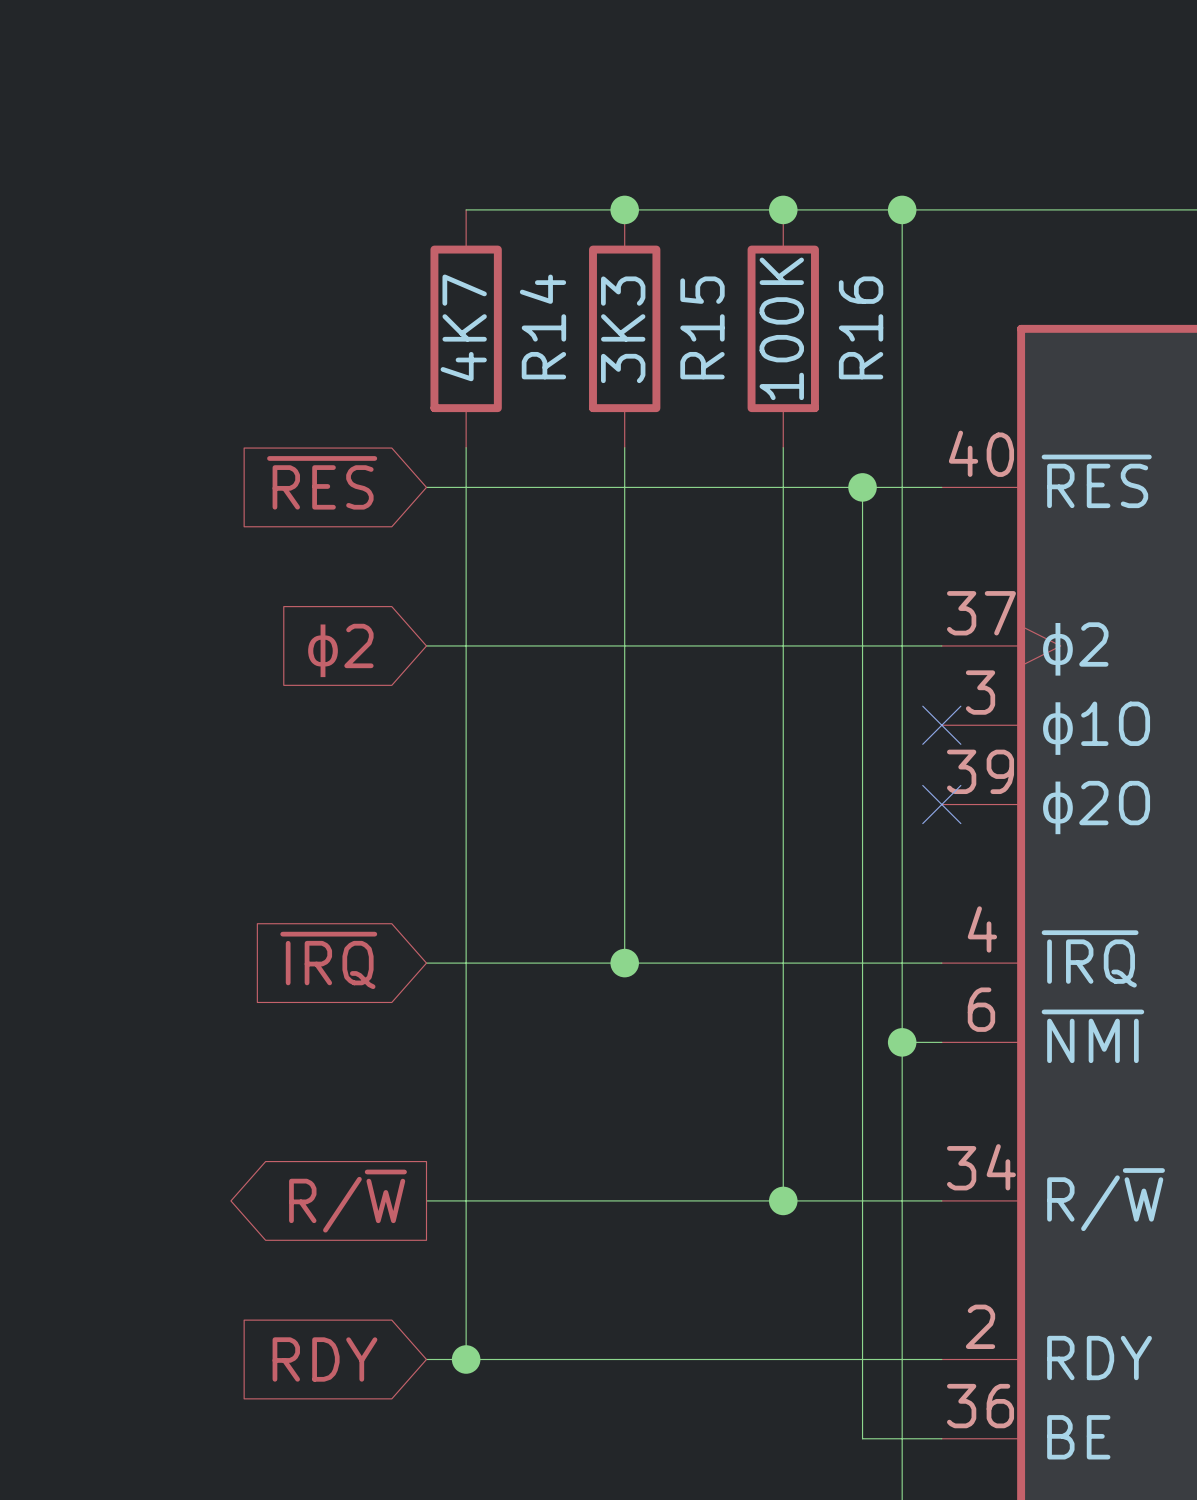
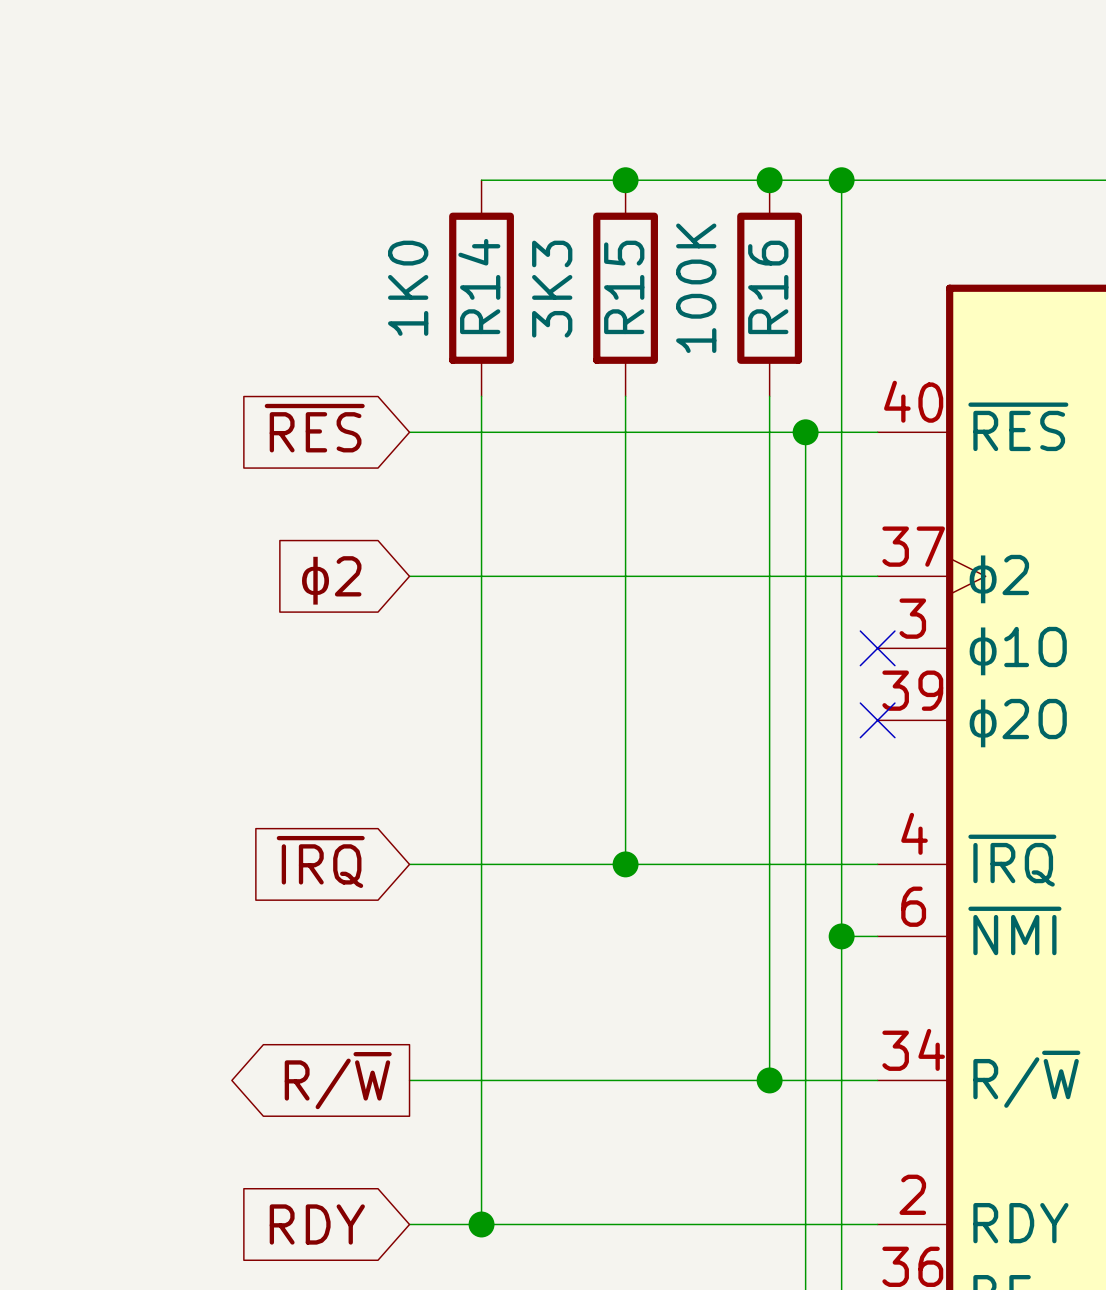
wire: (466, 209) (505, 209) -> none
junction position: (624, 209) -> (625, 180)
junction position: (783, 209) -> (769, 180)
R14 name position: R14 (542, 326) -> R14 (479, 286)
R14 value: 4K7 (463, 327) -> 1K0 (408, 288)
R15 name position: R15 (702, 327) -> R15 (624, 287)
R16 name position: R16 (861, 327) -> R16 (768, 287)
R14 position: (466, 328) -> (481, 288)
R15 position: (624, 328) -> (625, 288)
R16 value position: 100K (781, 328) -> 100K (696, 288)
R16 position: (783, 328) -> (769, 288)
R15 value position: 3K3 (623, 329) -> 3K3 (552, 289)
wire: (466, 447) (466, 1359) -> (481, 396) (481, 1224)
wire: (624, 447) (624, 963) -> (625, 396) (625, 864)
wire: (783, 447) (783, 1200) -> (769, 396) (769, 1080)
junction position: (624, 963) -> (625, 864)
junction position: (783, 1200) -> (769, 1080)
junction position: (466, 1359) -> (481, 1224)

